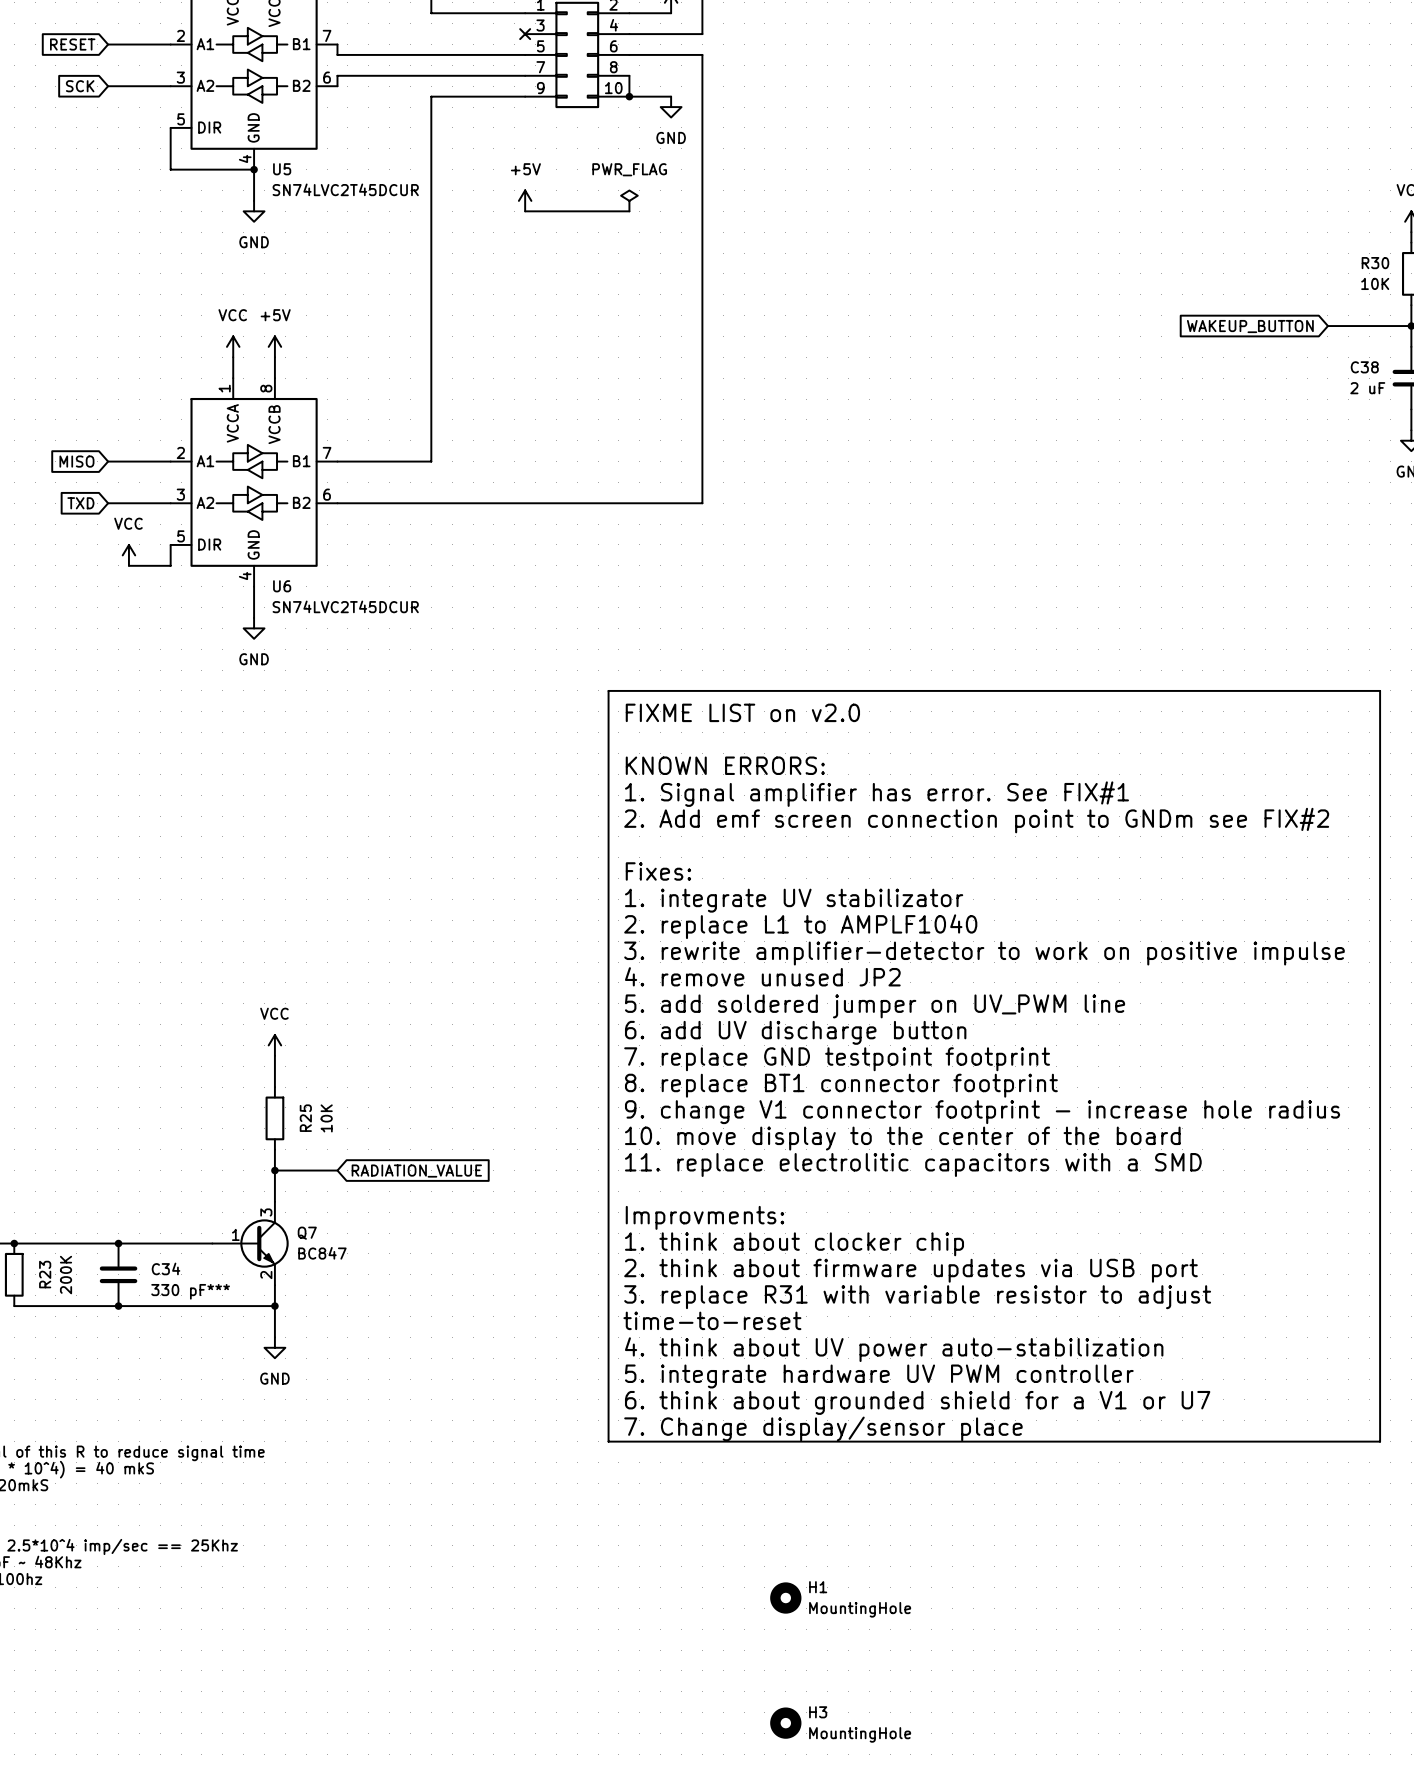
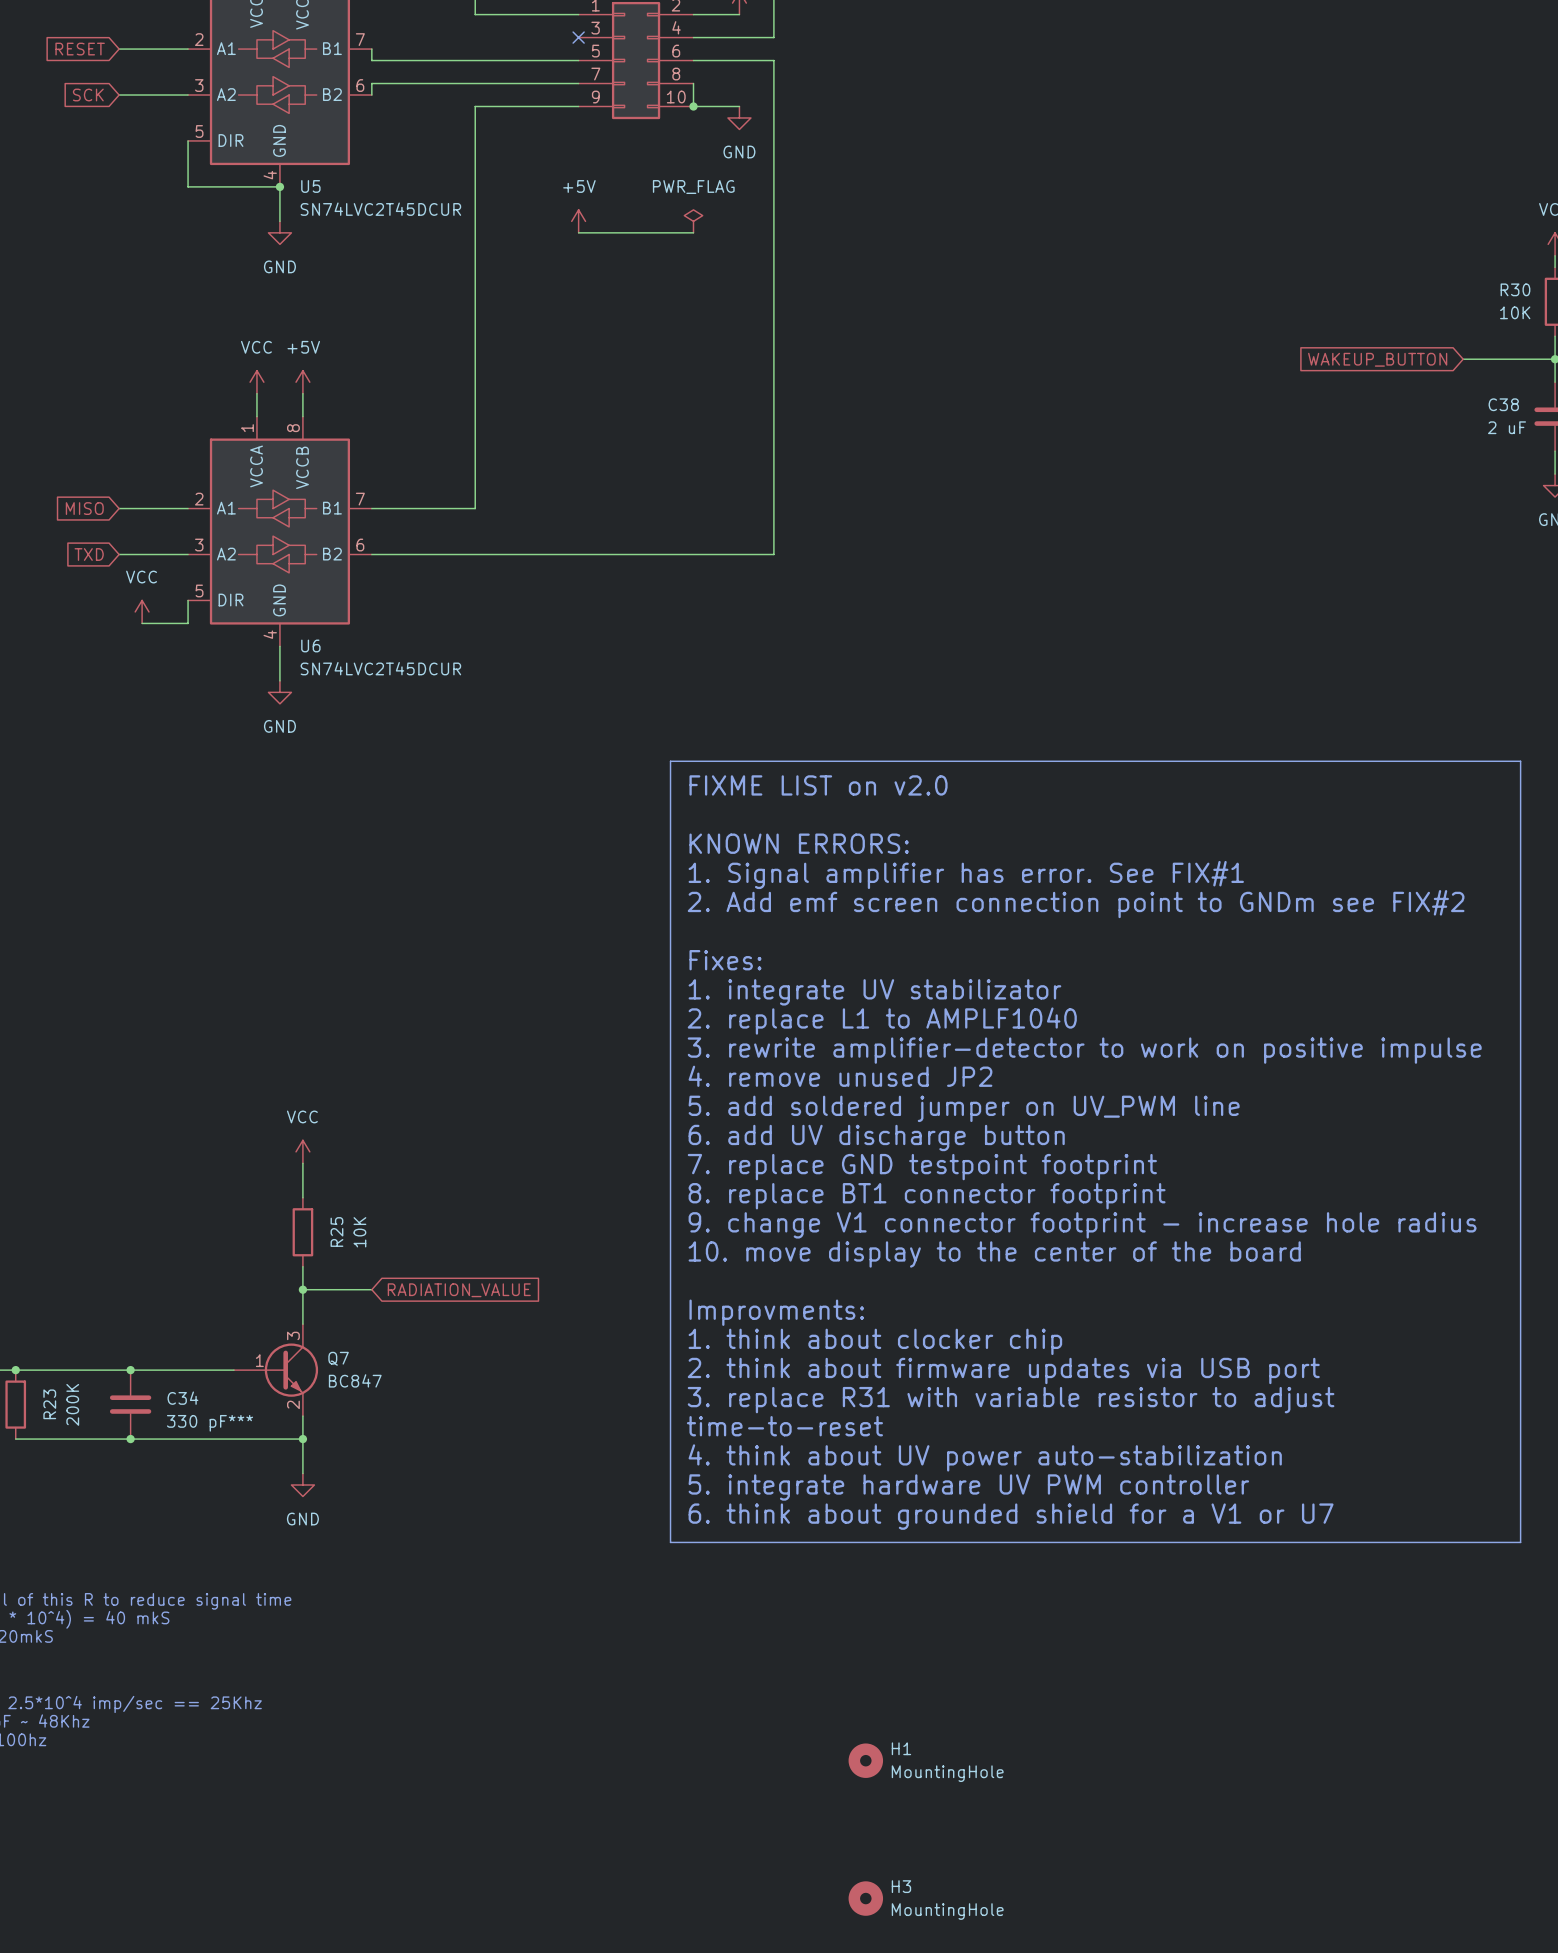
text: 11. replace electrolitic capacitors with a SMD (913, 1164) -> none
text: none -> Improvments: (776, 1312)
text: Improvments: (704, 1217) -> 1. think about clocker chip (875, 1341)
text: 1. think about clocker chip (794, 1244) -> 2. think about firmware updates via USB port (1003, 1370)
text: 2. think about firmware updates via USB port (910, 1270) -> 3. replace R31 with variable resistor to adjust (1011, 1400)
text: 3. replace R31 with variable resistor to adjust (917, 1297) -> time-to-reset (784, 1426)
text: time-to-reset (712, 1320) -> 4. think about UV power auto-stabilization (985, 1457)
text: 4. think about UV power auto-stabilization (894, 1349) -> 5. integrate hardware UV PWM controller (968, 1487)
text: 5. integrate hardware UV PWM controller (879, 1376) -> 6. think about grounded shield for a V1 or U7 (1011, 1516)
line: (608, 1399) (608, 1441) (1380, 1441) (1380, 1399) -> (670, 1542) (1520, 1542)
text: 6. think about grounded shield for a V1 or U7 (917, 1402) -> none
text: 7. Change display/sensor place (823, 1428) -> none

